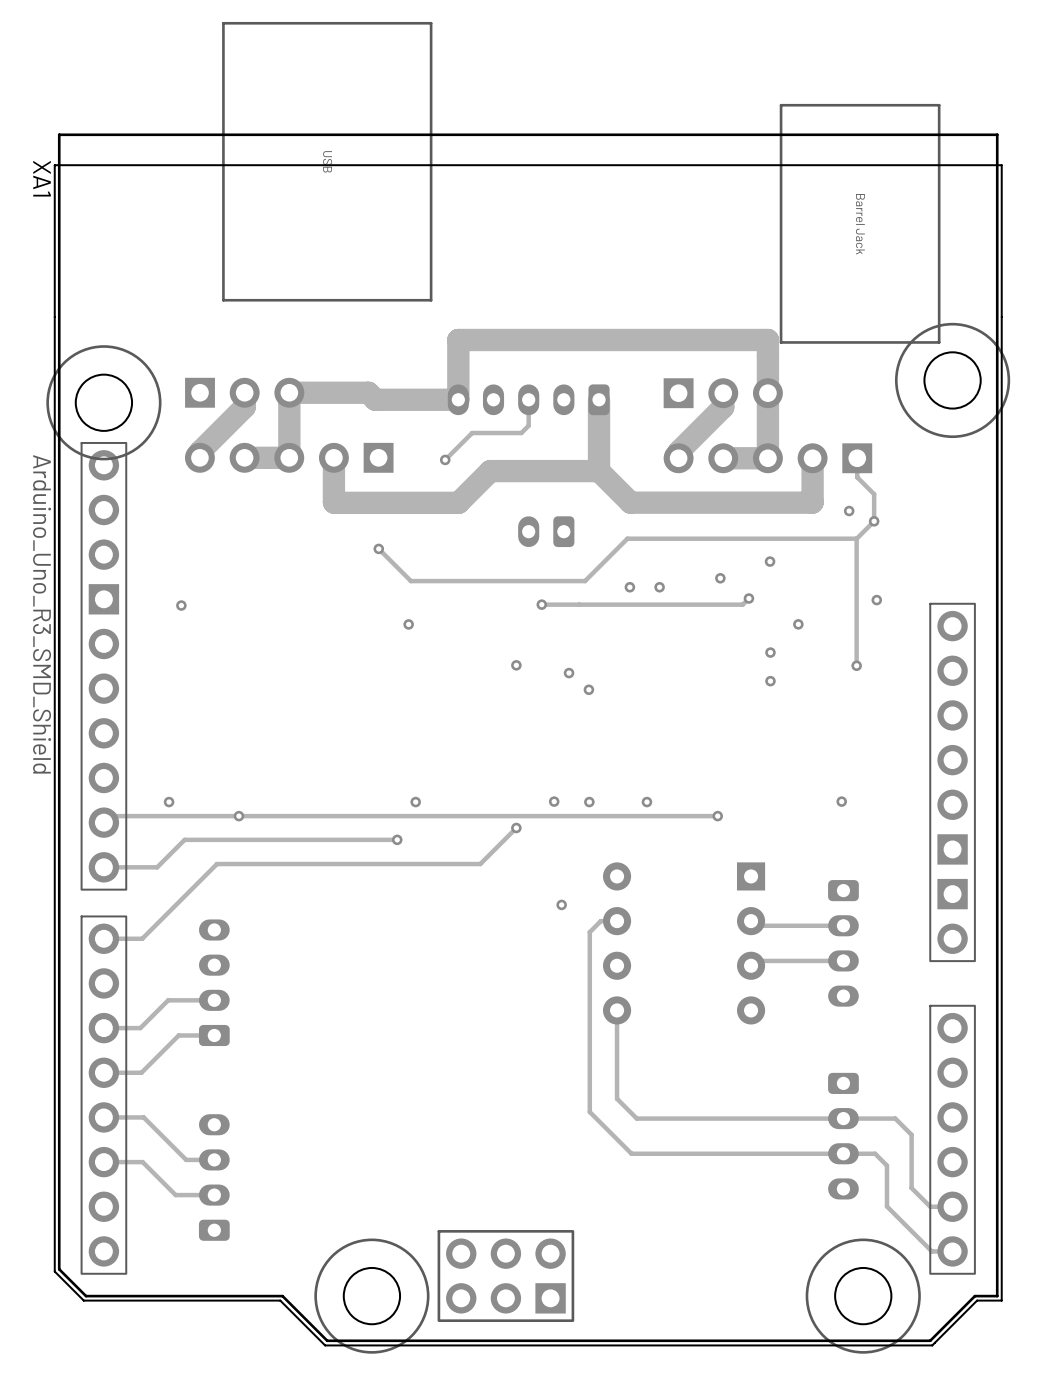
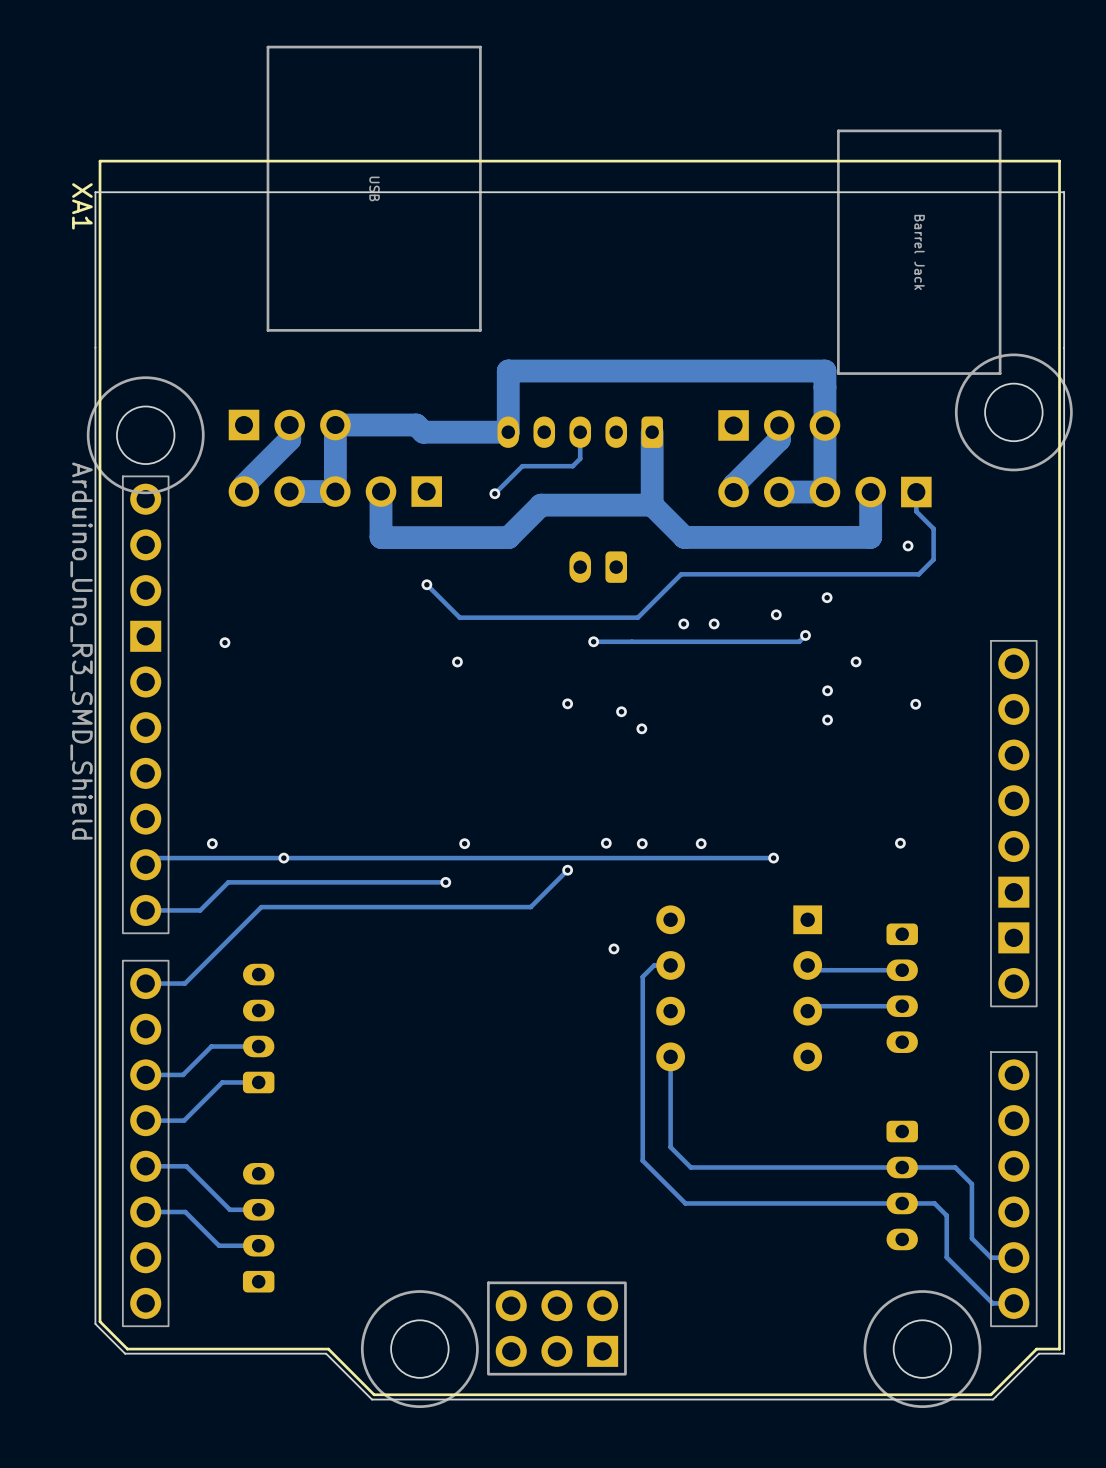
track: (874, 521) (856, 538) (856, 665) -> (933, 556) (933, 559) (918, 574) (915, 574)
via: (874, 521) -> none
via: (876, 600) -> none

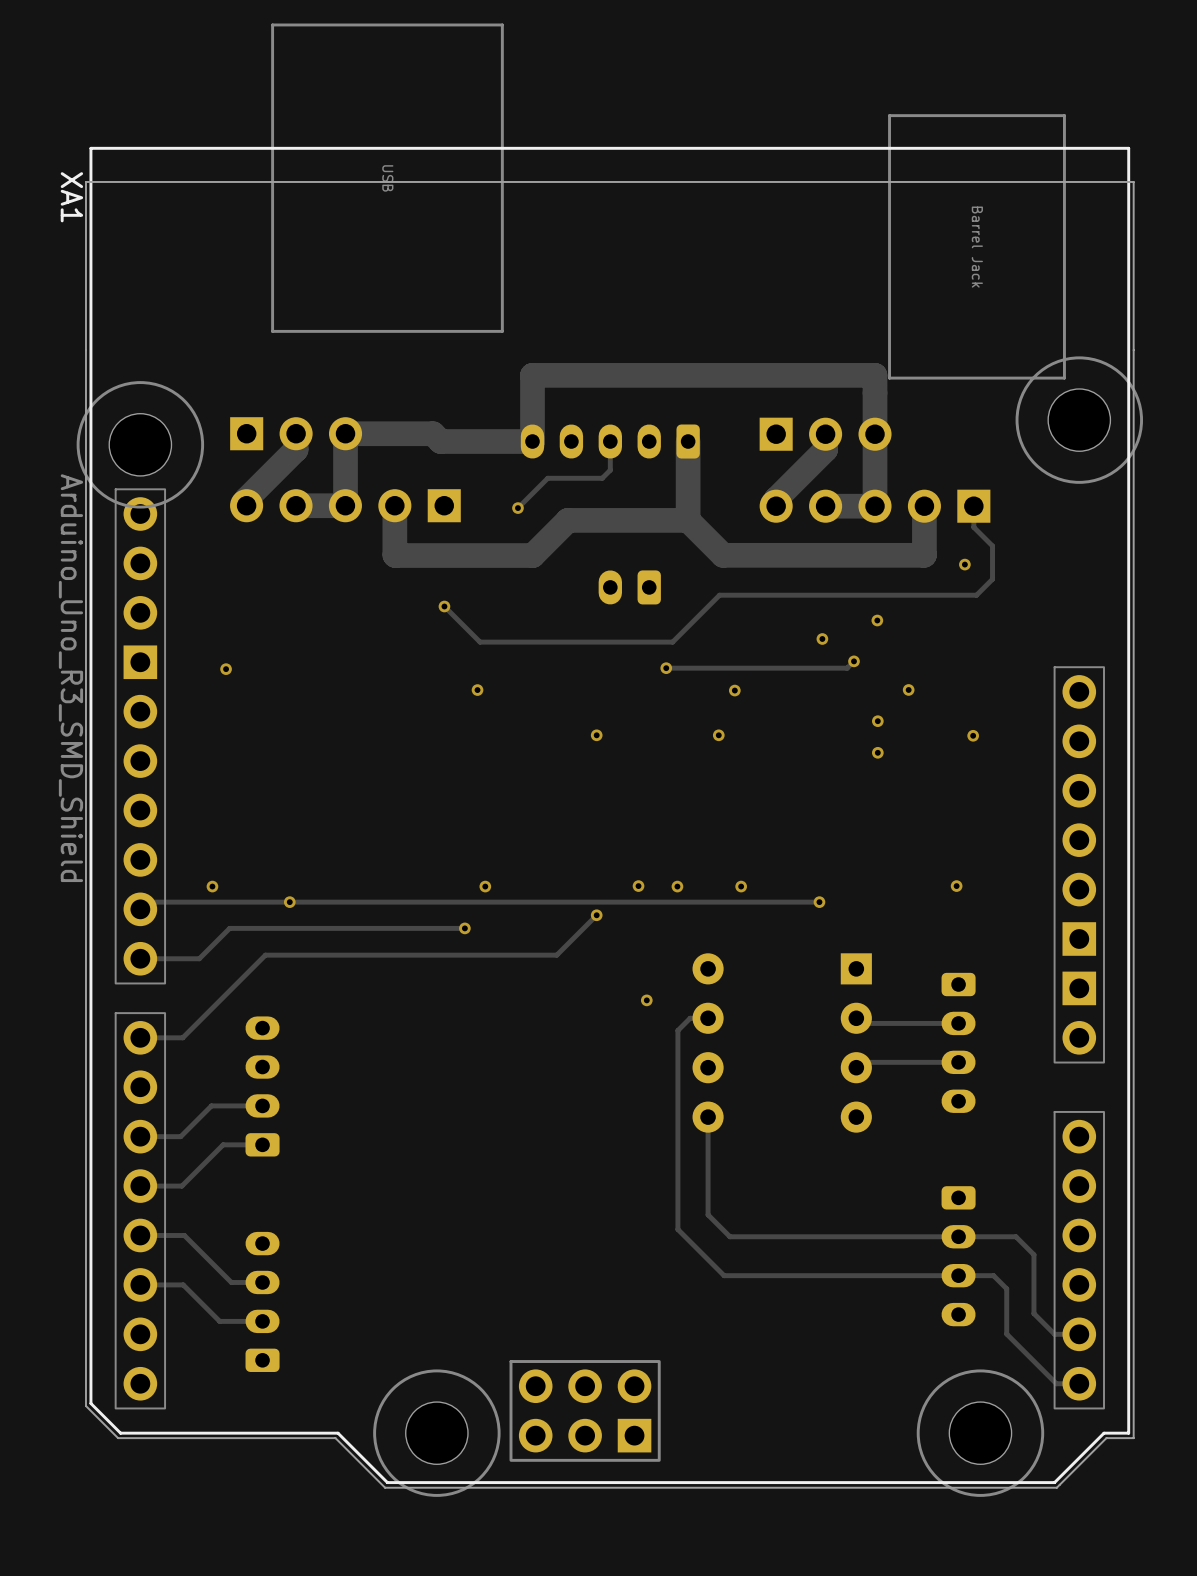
via: (683, 623) -> none
via: (714, 623) -> none
via: (593, 641) -> none
track: (631, 641) (593, 641) -> none
via: none -> (666, 668)
via: none -> (734, 690)
via: none -> (718, 735)
via: (621, 711) -> none
via: (641, 728) -> none

